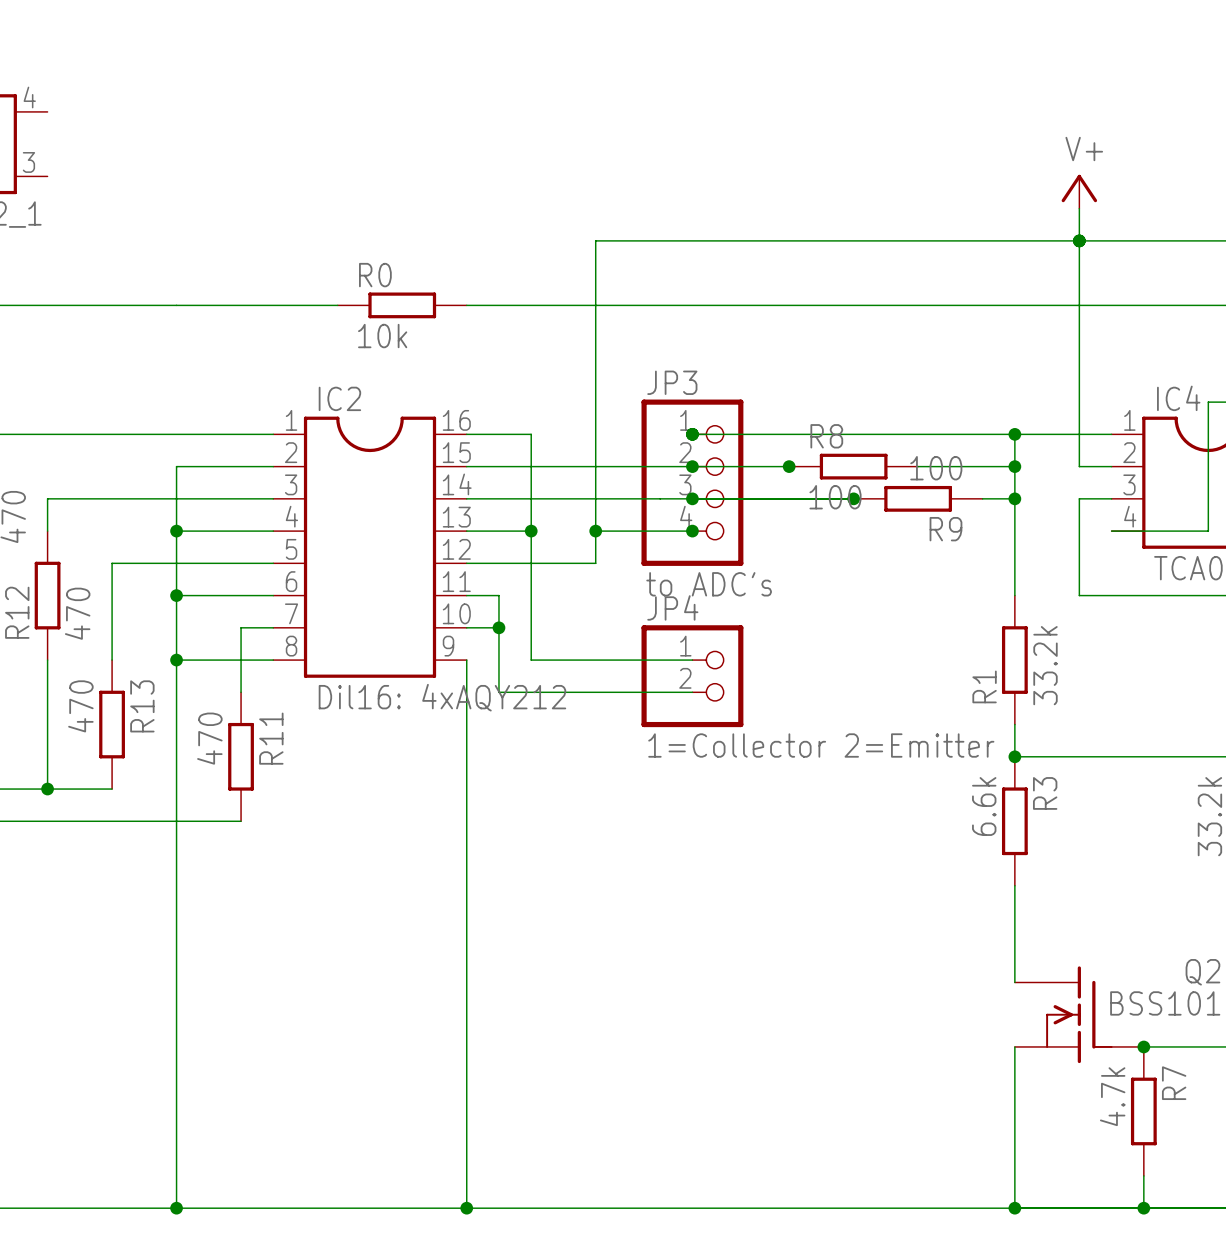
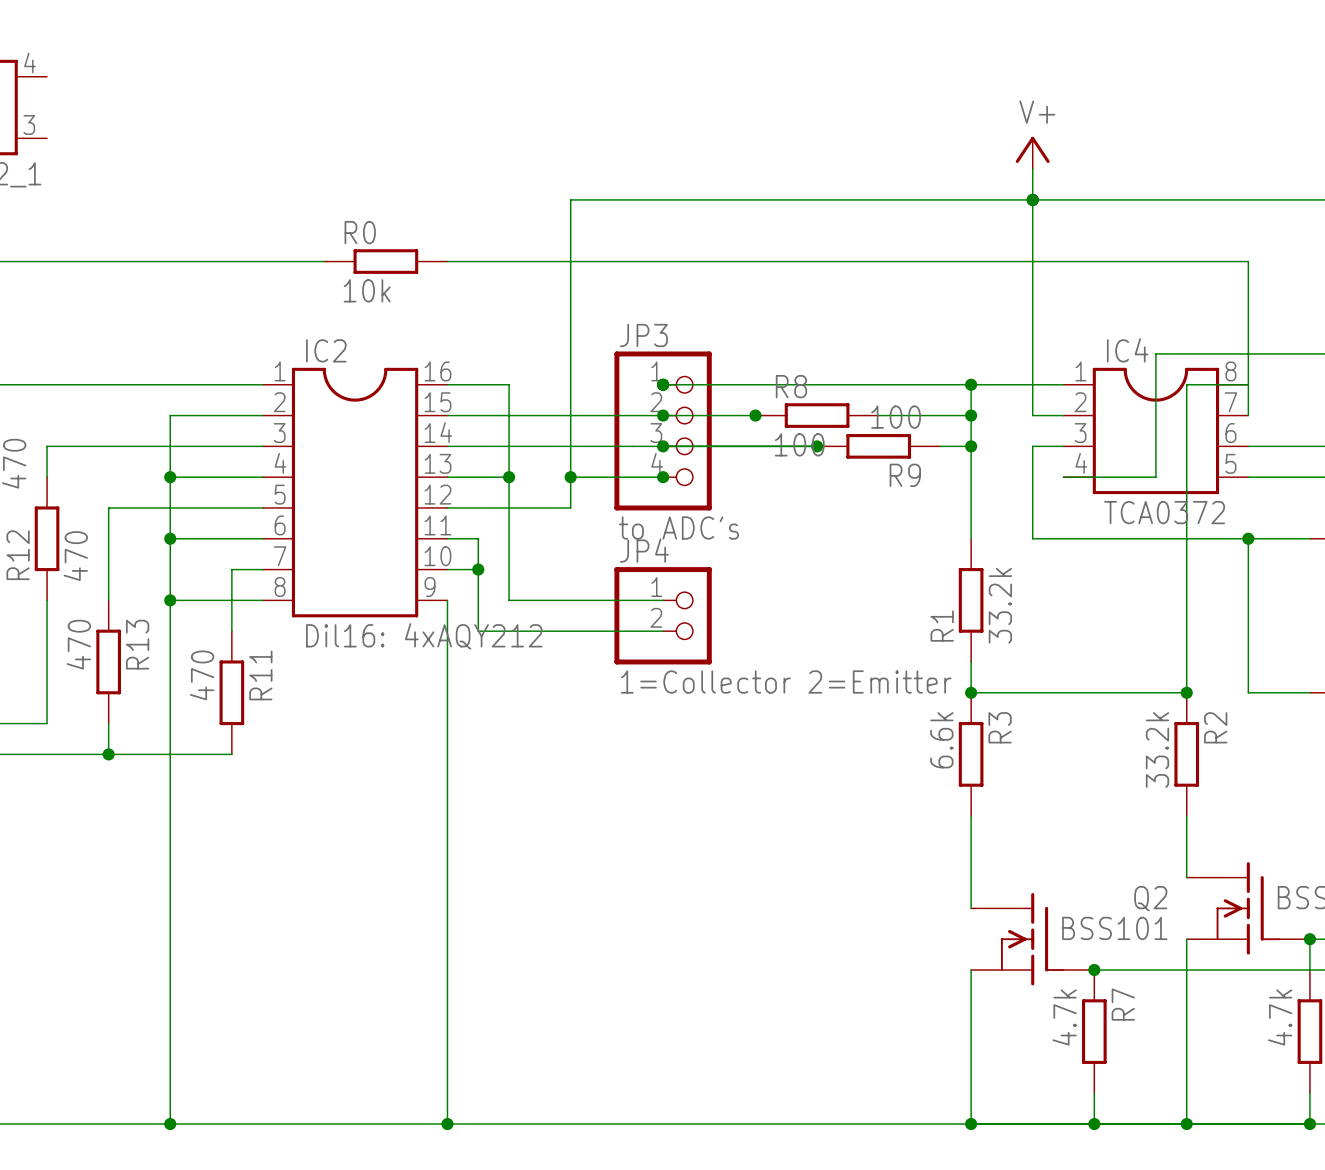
wire: (47, 789) (112, 789) -> (108, 754) (108, 723)
junction position: (47, 789) -> (108, 754)

